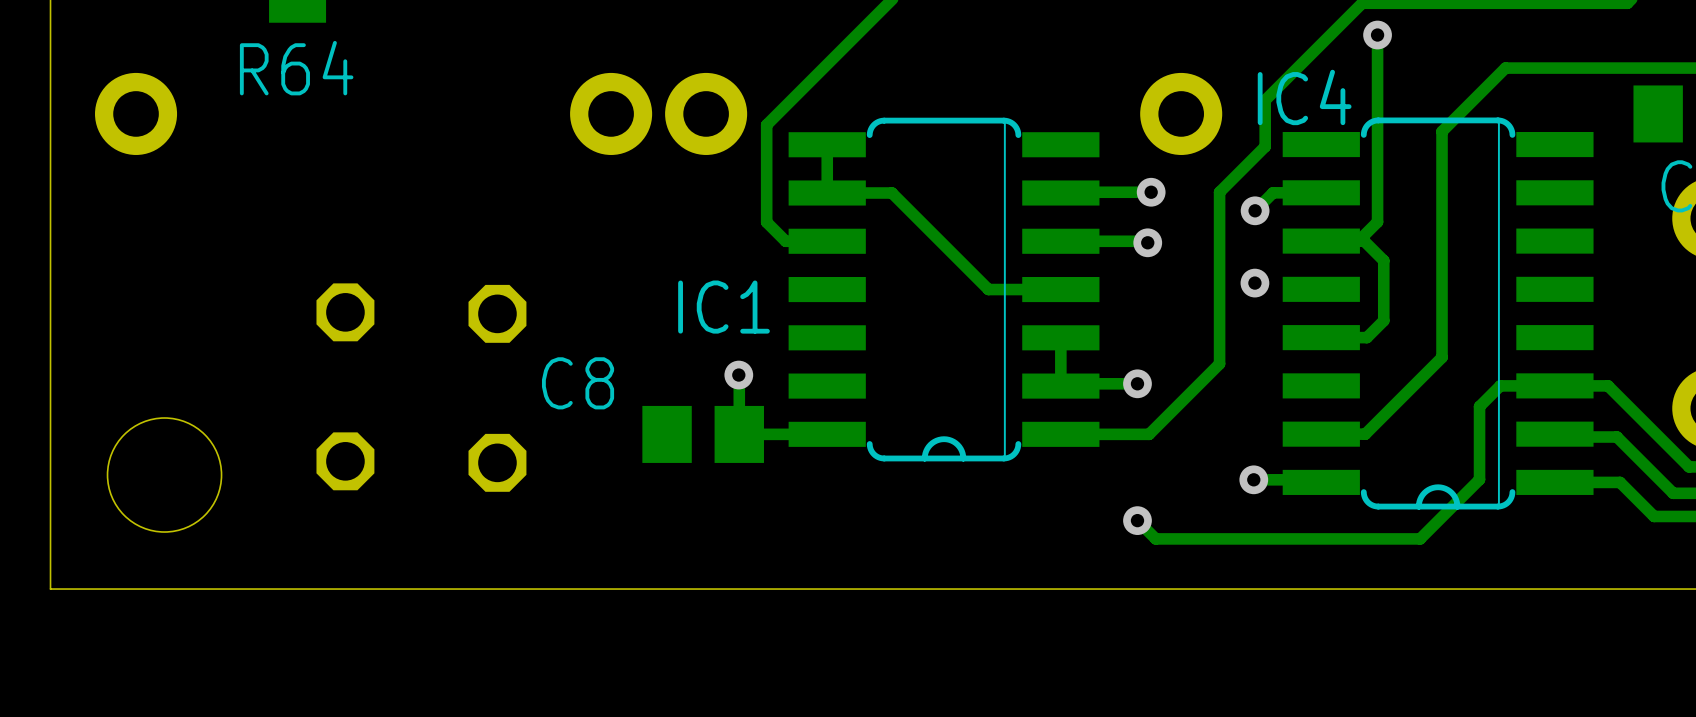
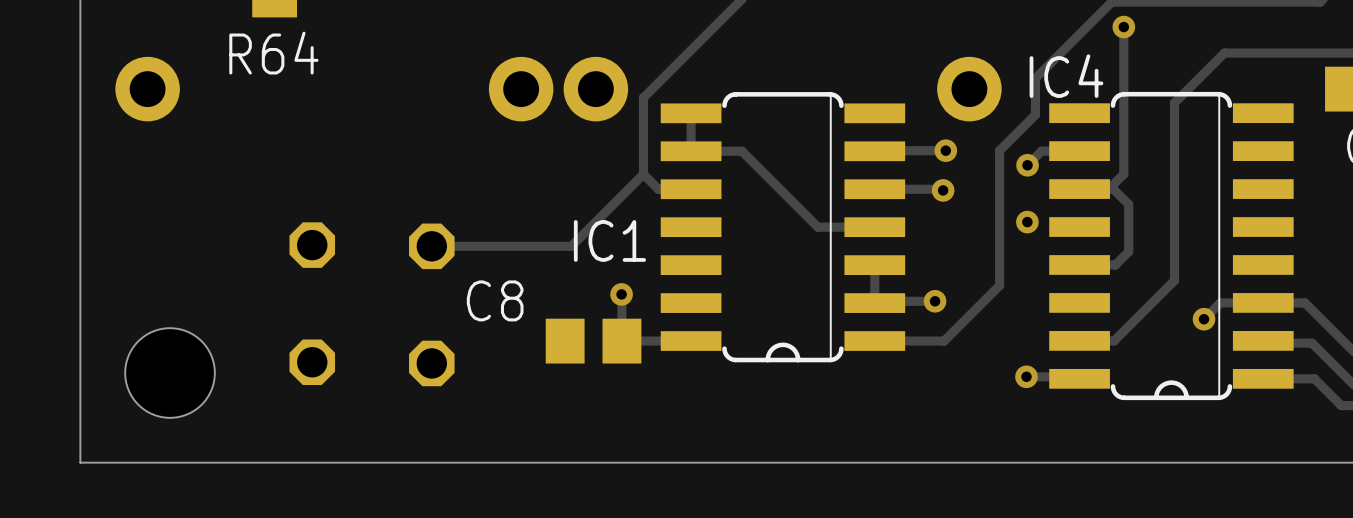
track: none -> (643, 174) (571, 246) (431, 246)
track: (1479, 406) (1479, 479) (1420, 538) (1155, 538) (1137, 520) -> none
via: none -> (1204, 319)
via: (1137, 520) -> none

